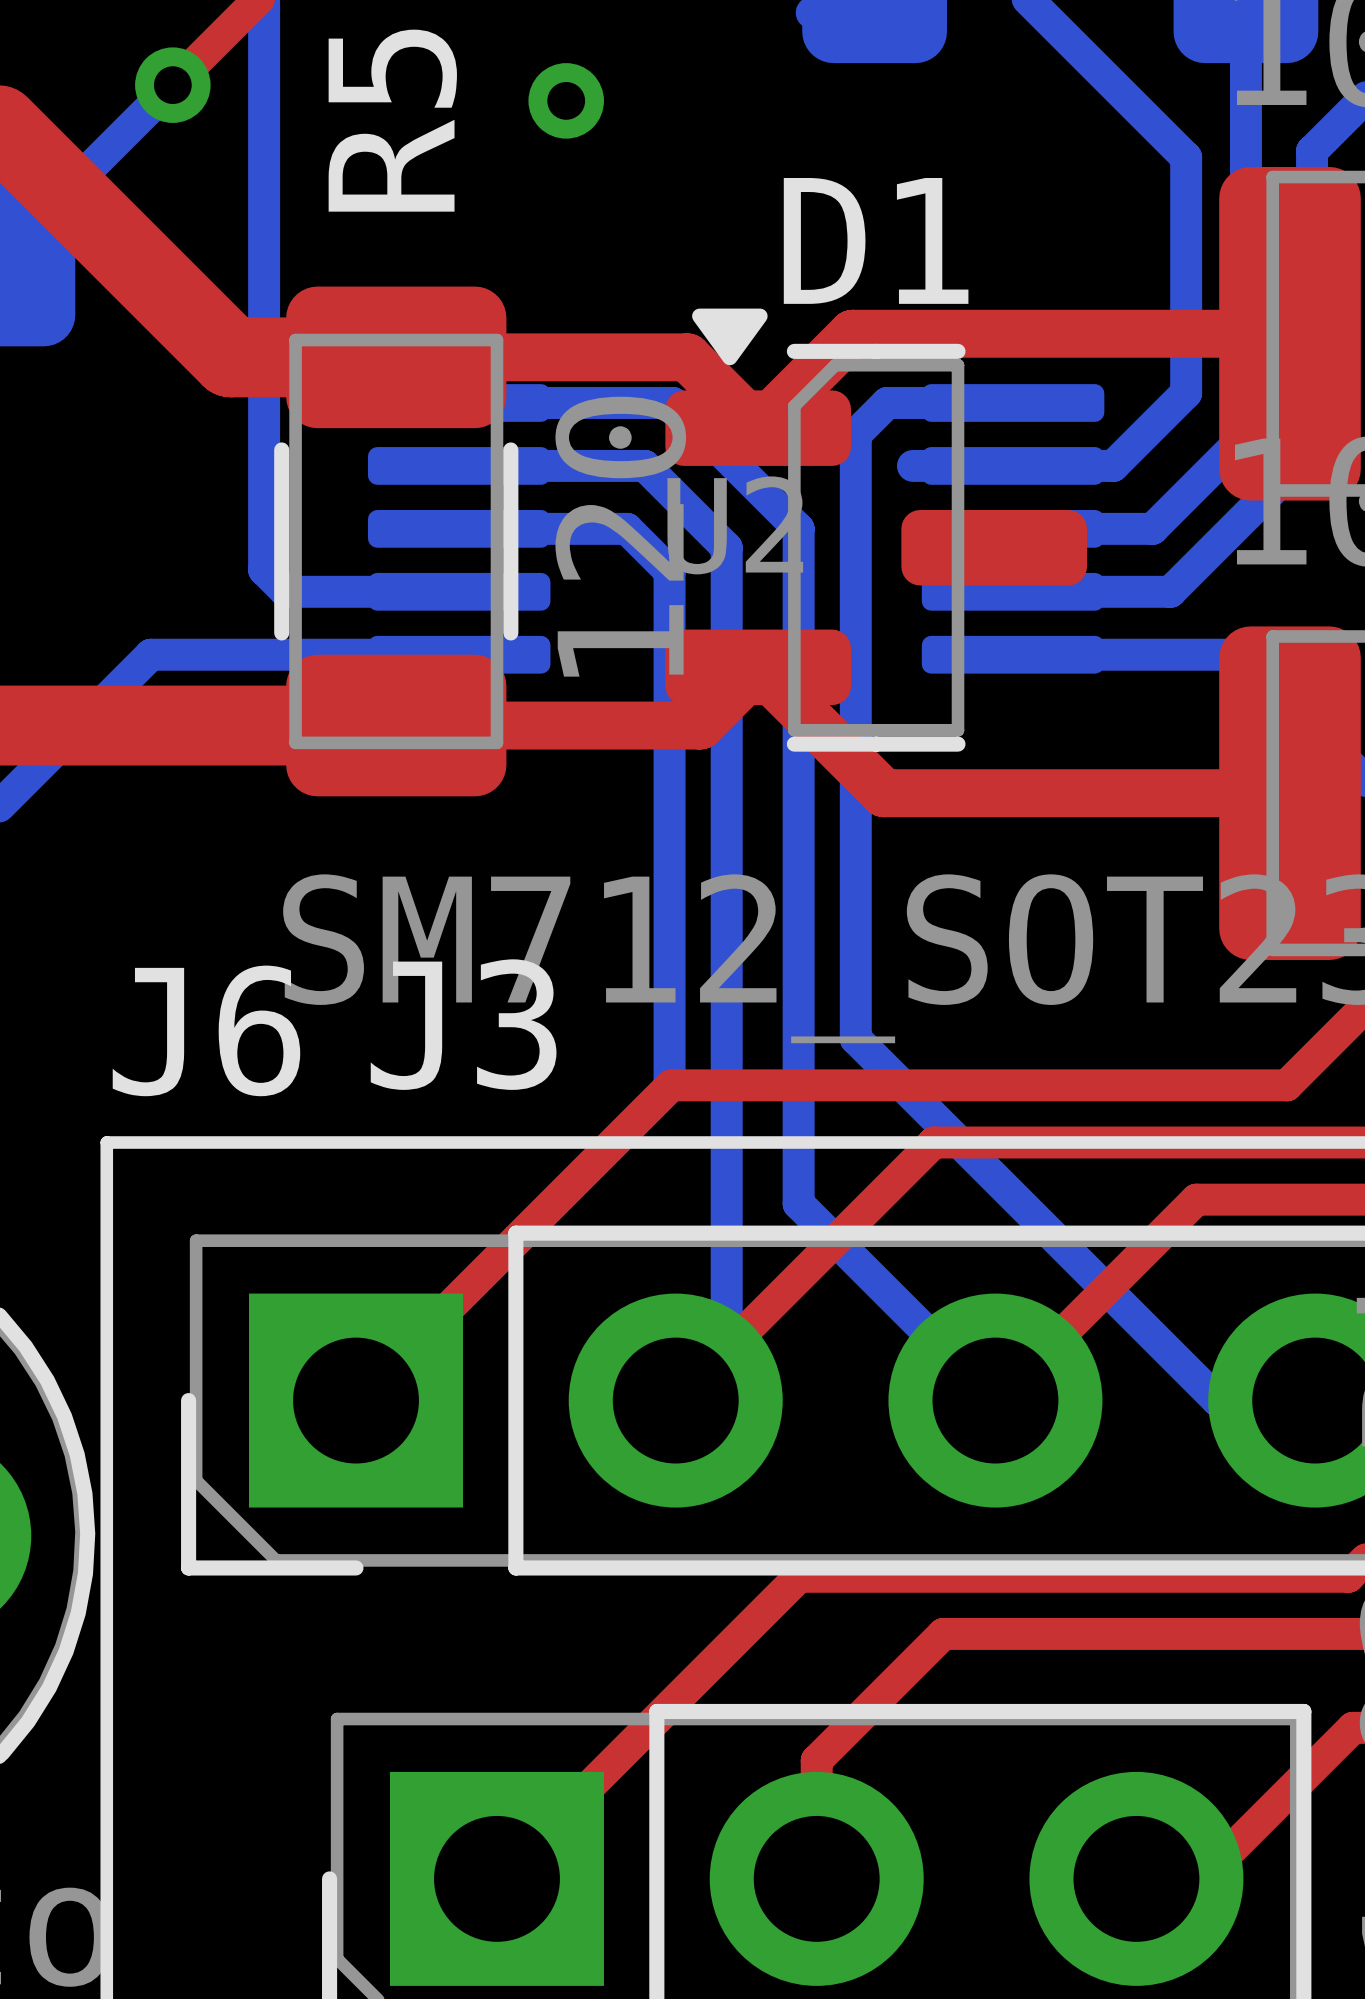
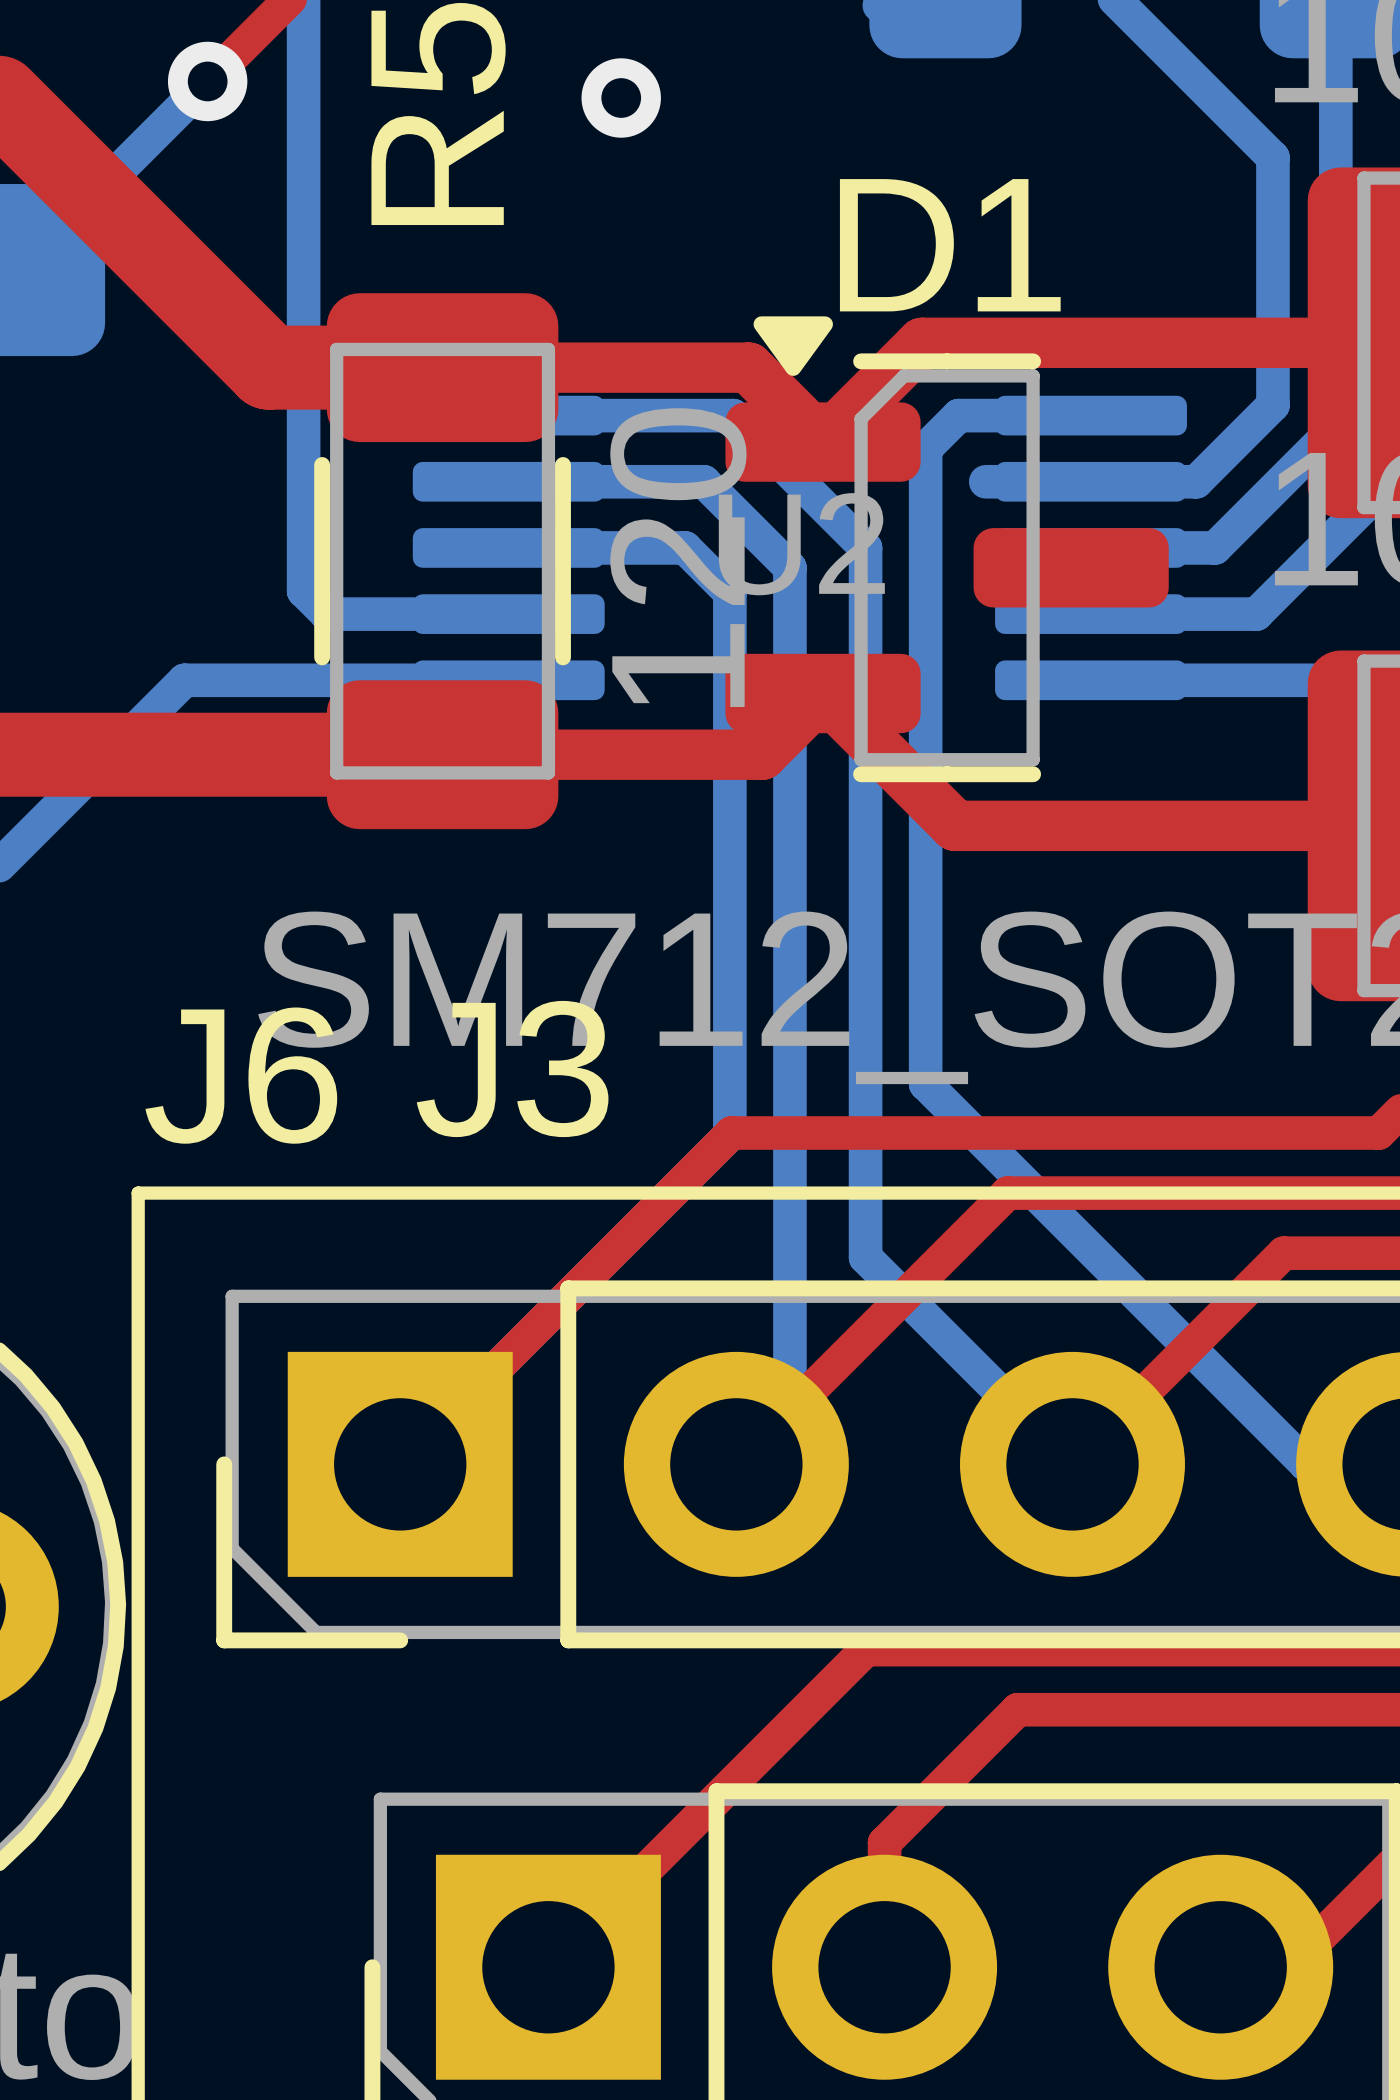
bottom track: (1245, 414) (1245, 435) (1152, 528) (1131, 528) -> (1335, 427) (1215, 547)

